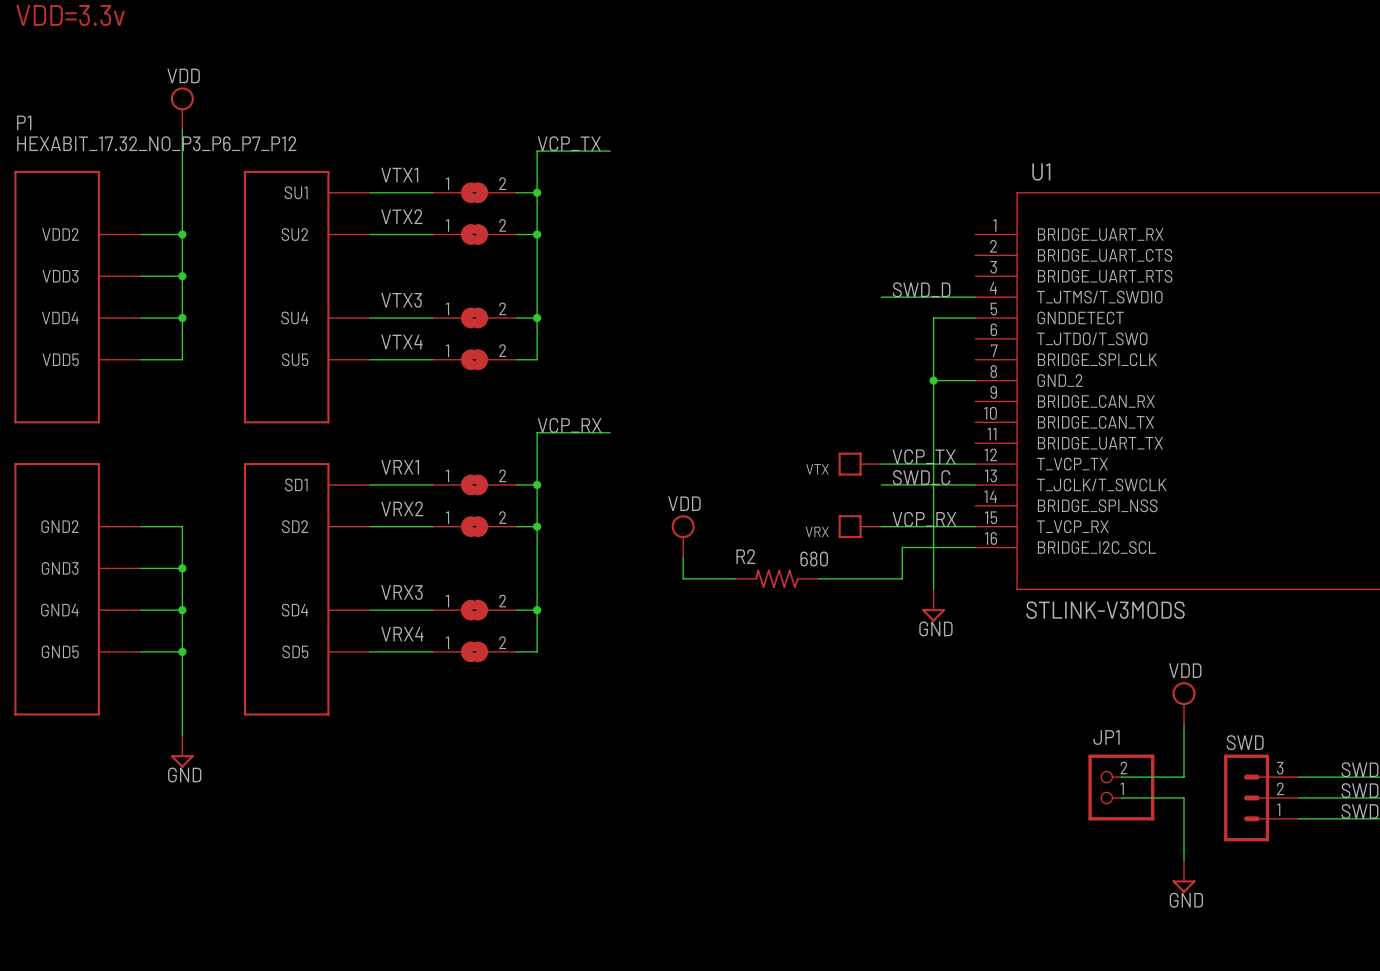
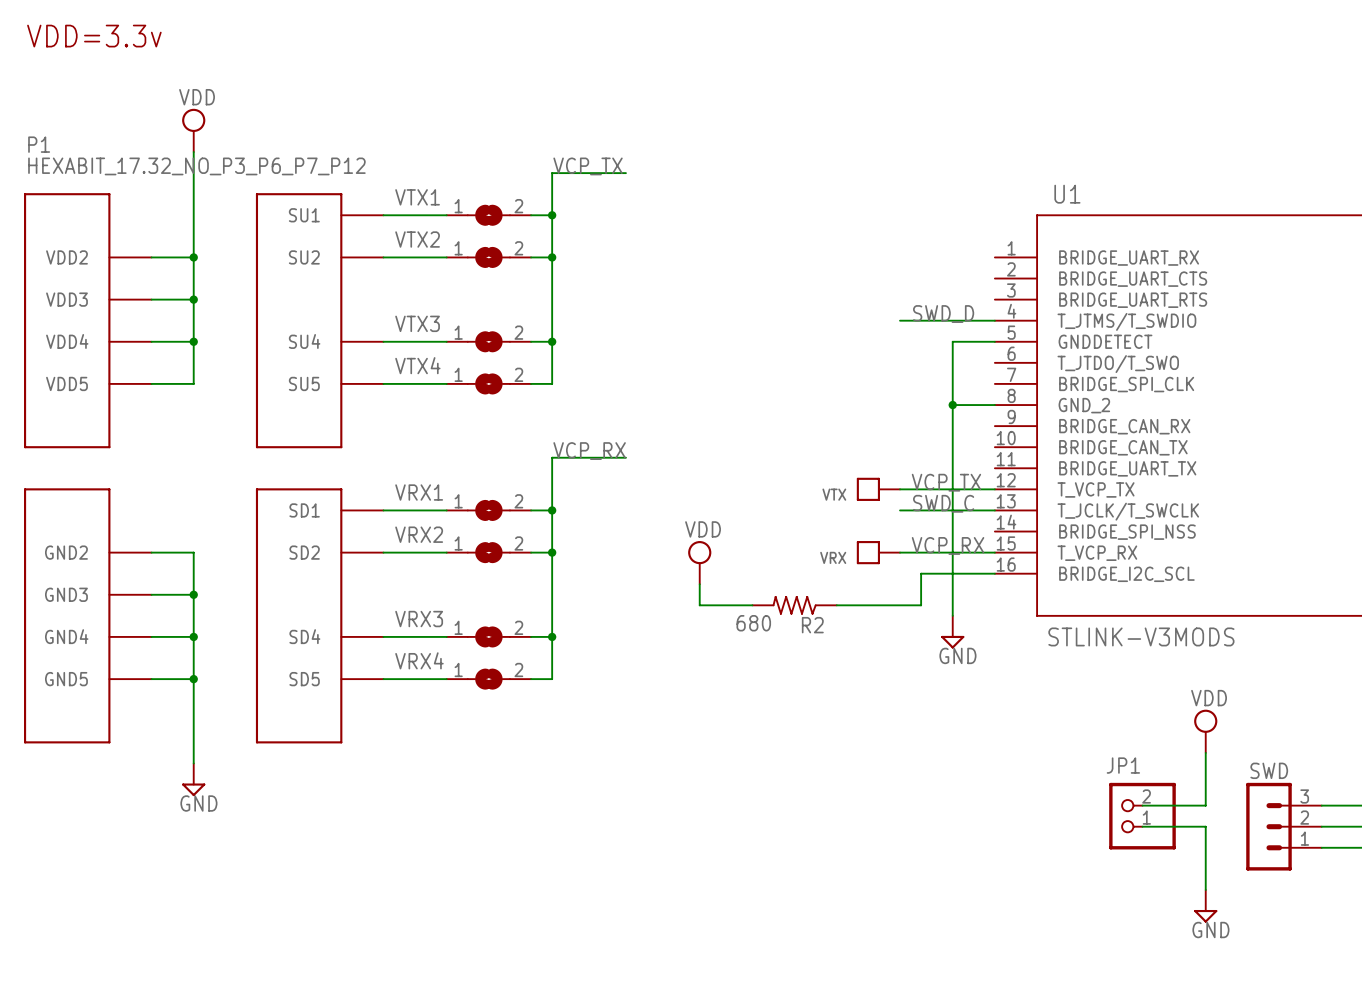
R2 name position: R2 (745, 556) -> R2 (812, 625)
R2 value: 680 (814, 559) -> none
R2 text: none -> 680 (753, 623)

